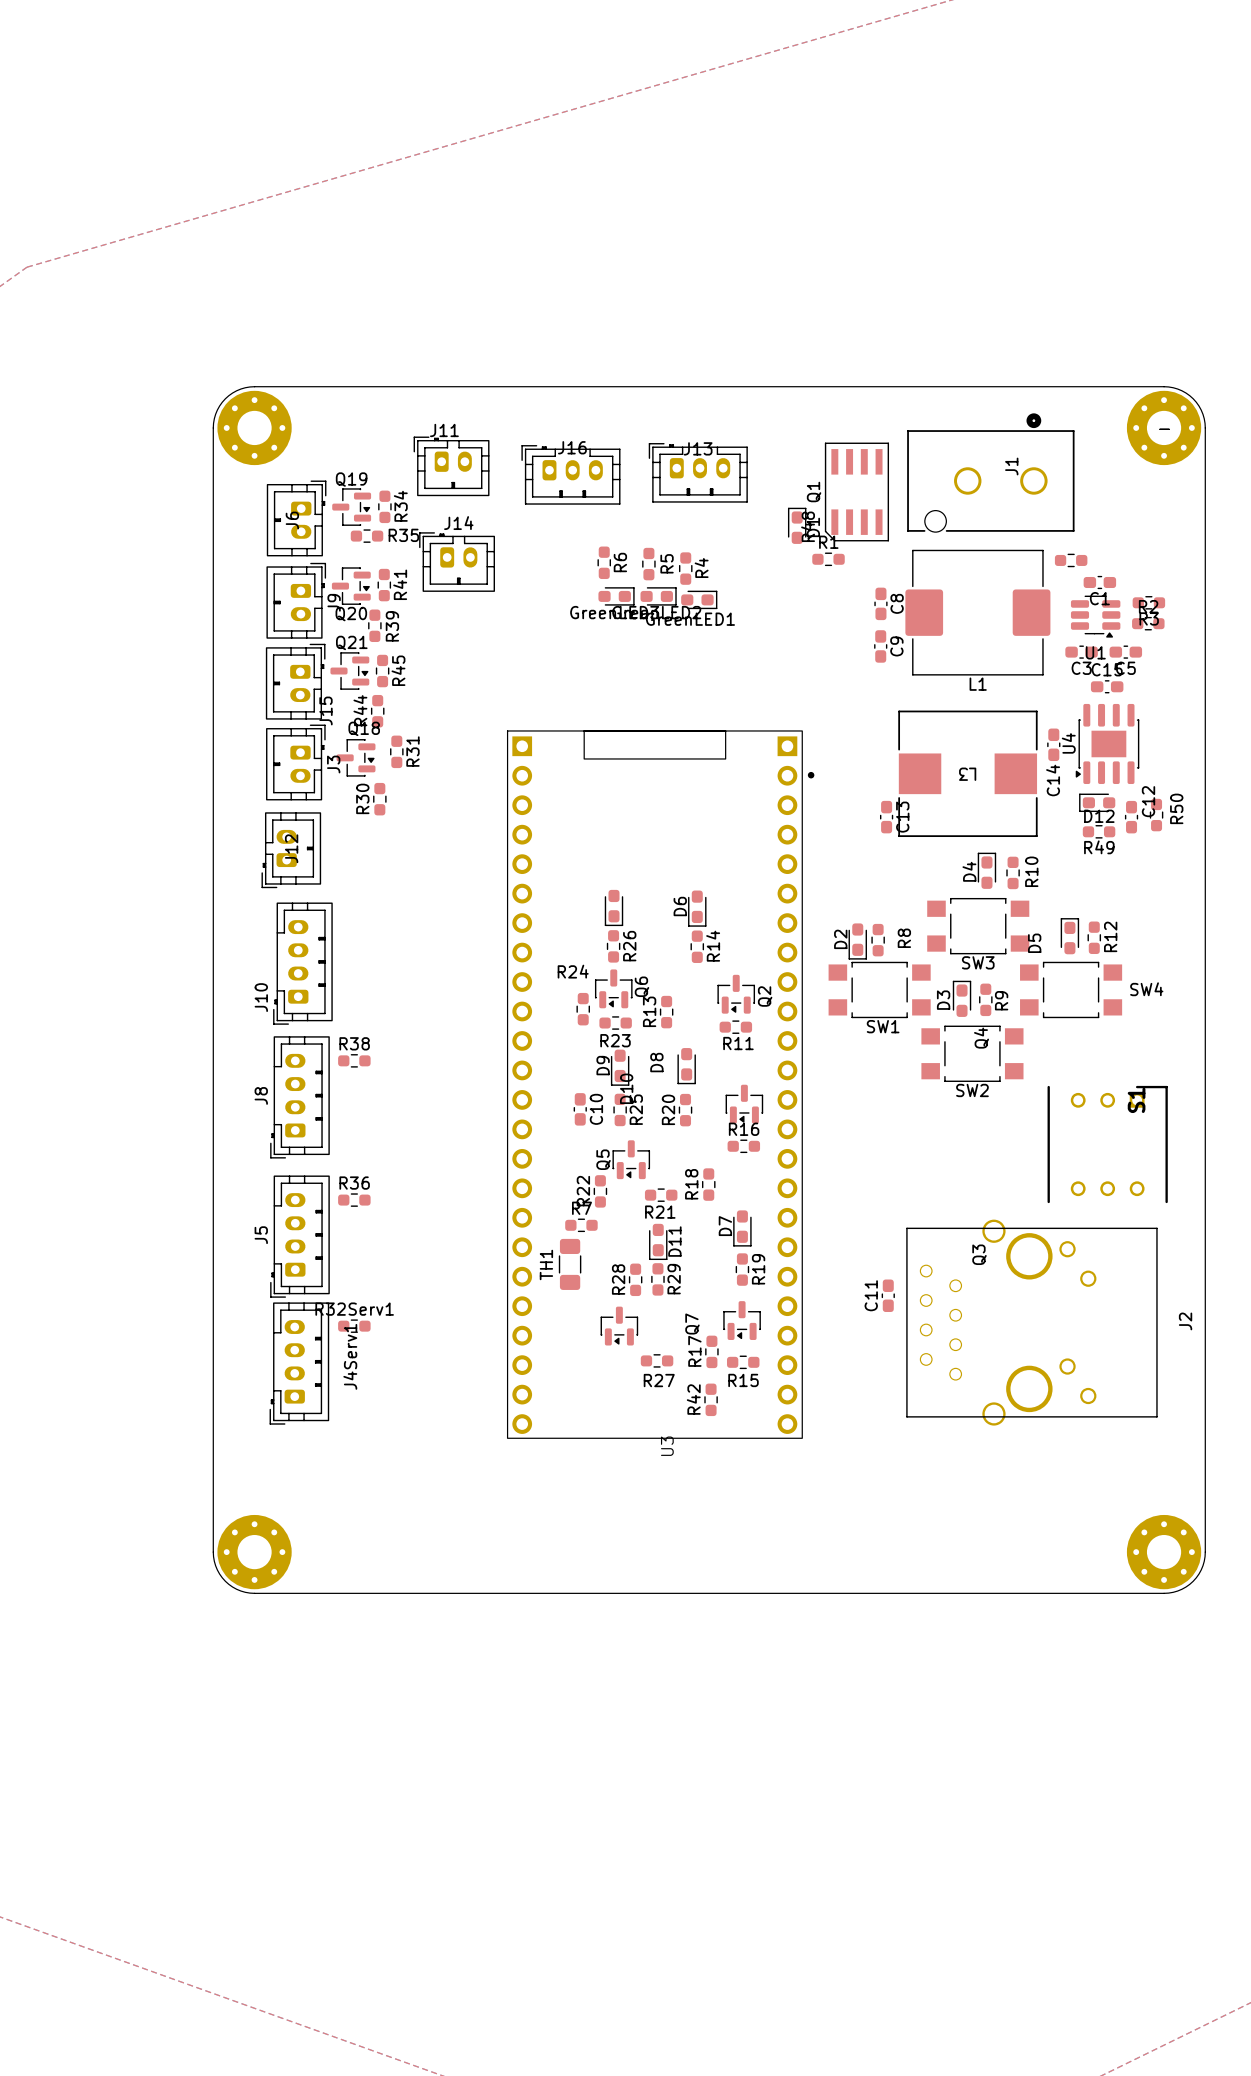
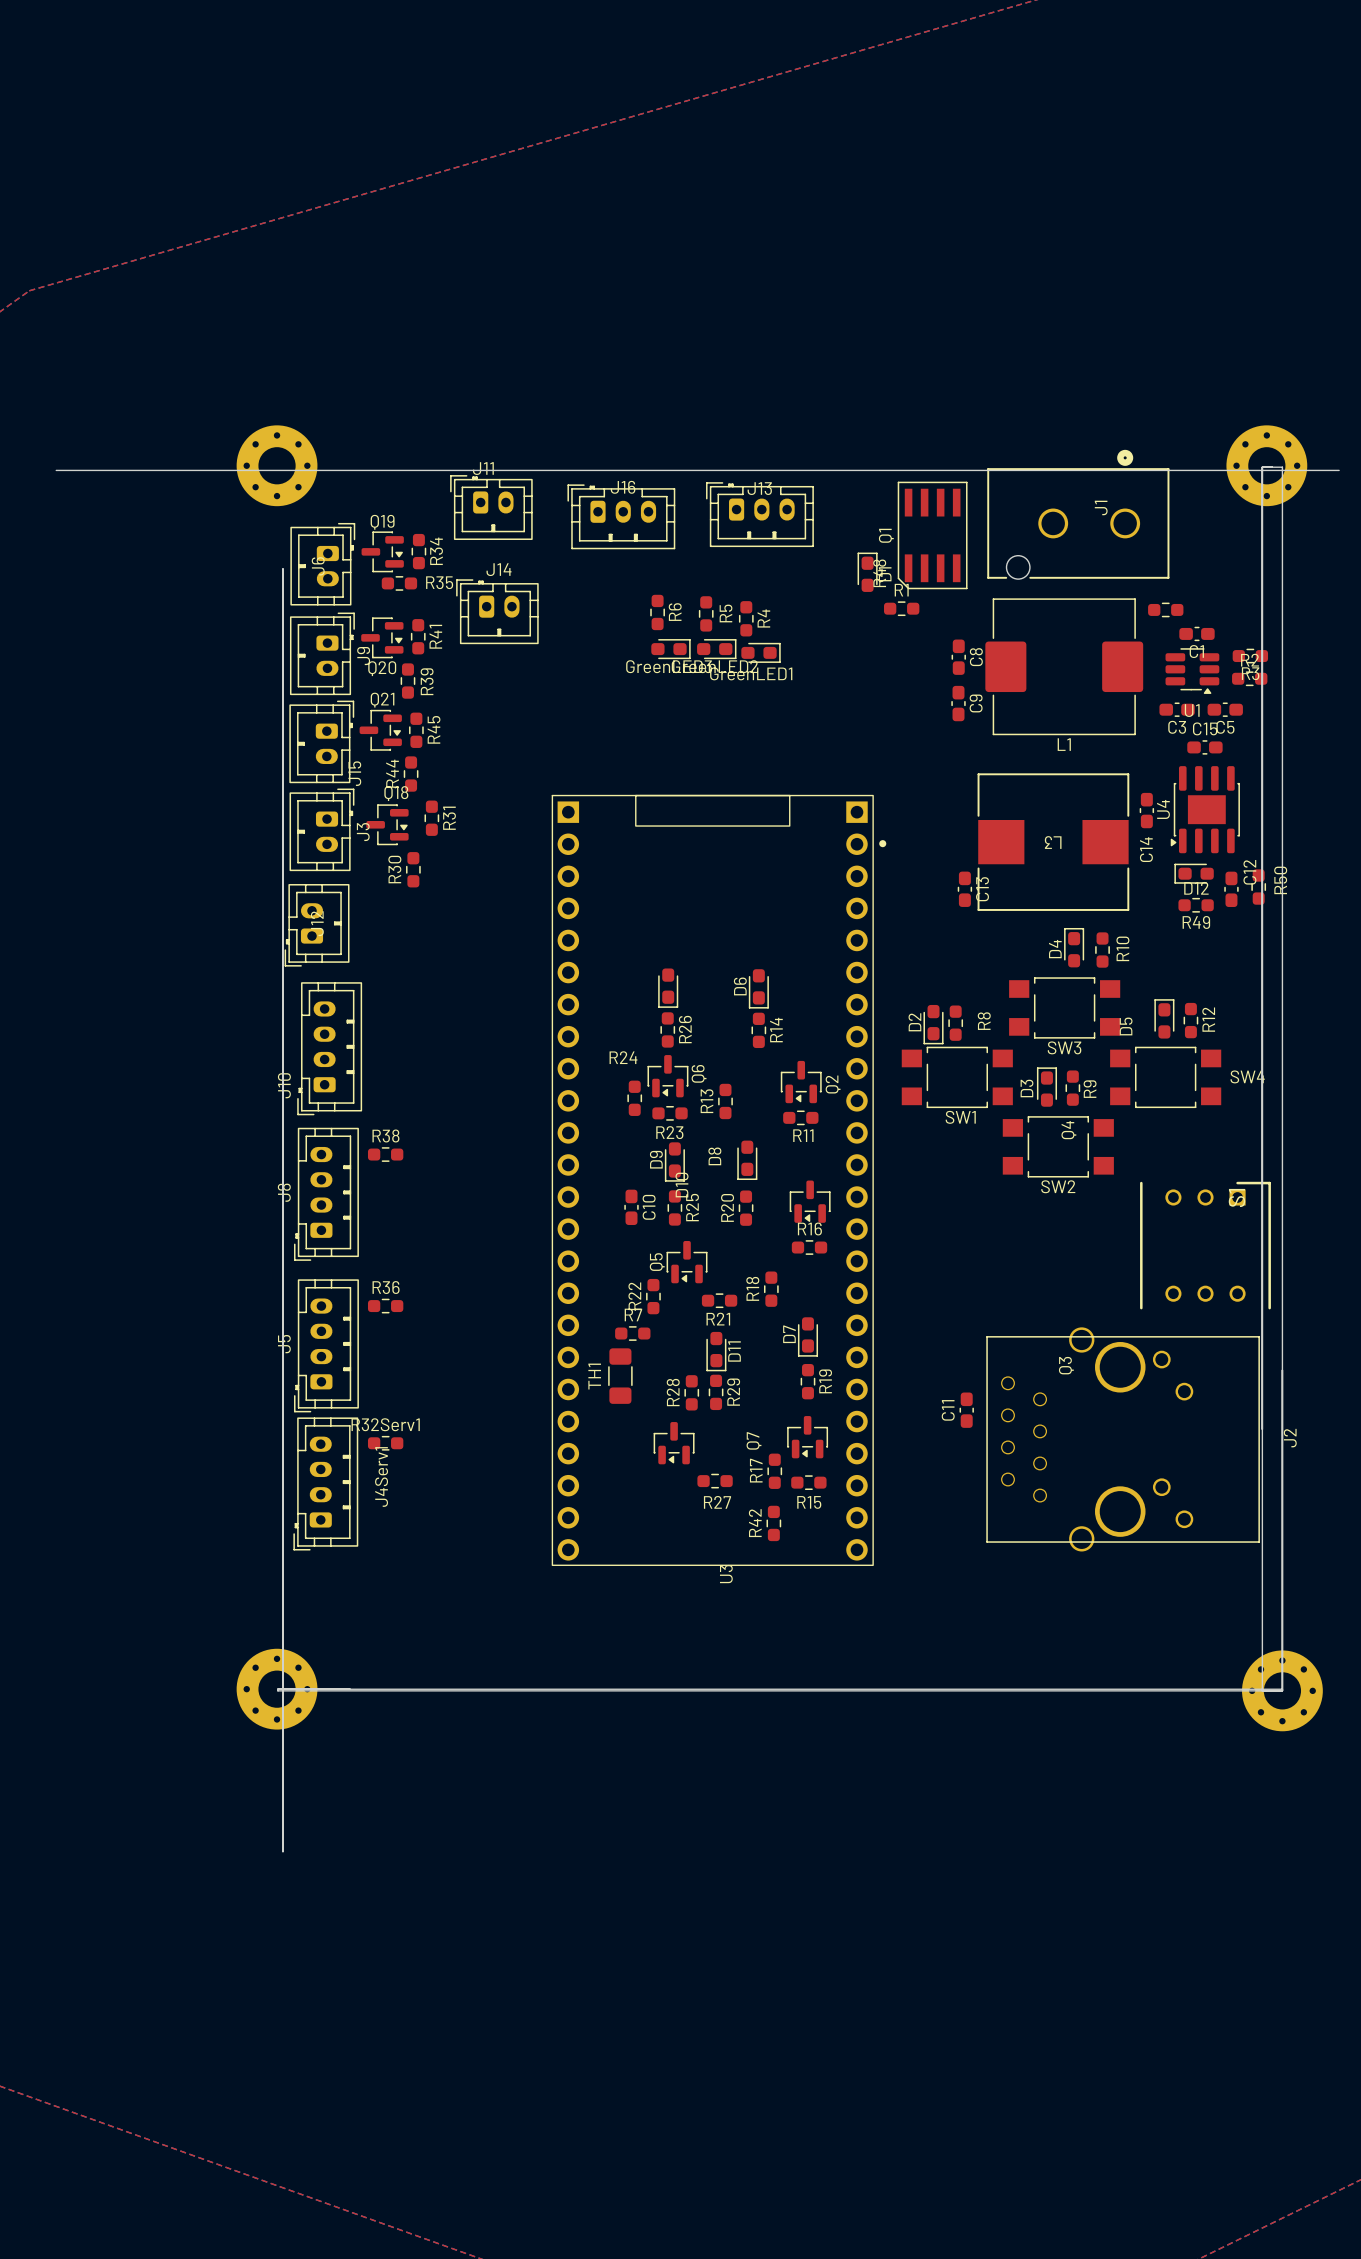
board edge: (254, 386) (1164, 386) (1181, 390) (1196, 402) (1202, 414) (1205, 427) (1205, 1552) (1201, 1570) (1189, 1584) (1177, 1591) (1164, 1593) (254, 1593) (236, 1589) (222, 1577) (215, 1565) (213, 1552) (213, 427) (215, 414) (225, 398) (236, 390) (254, 386) -> none
board edge: none -> (1262, 467) (1262, 1690)
board edge: none -> (1272, 467) (1282, 467) (1282, 1690) (277, 1690) (277, 1689) (1282, 1689)
board edge: none -> (56, 470) (1339, 470)
board edge: none -> (282, 568) (282, 1851)
part position: (1164, 1552) -> (1282, 1690)

